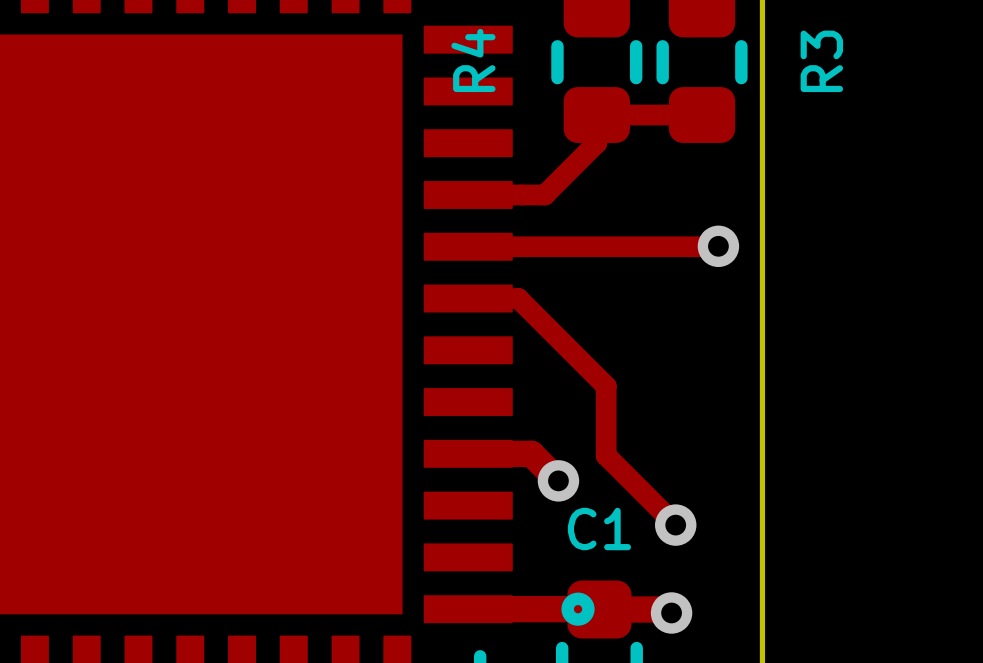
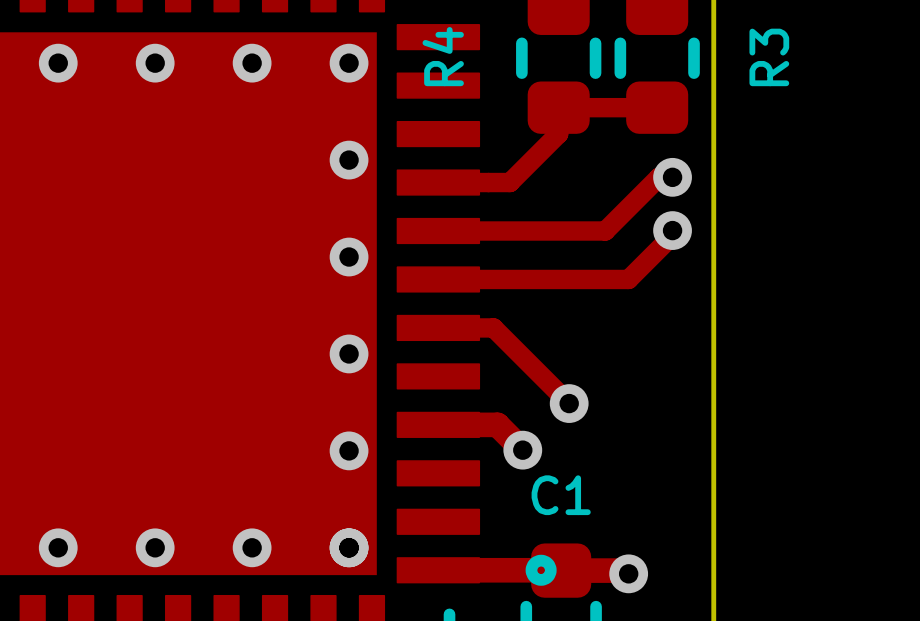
via: none -> (58, 63)
via: none -> (155, 63)
via: none -> (252, 63)
via: none -> (349, 63)
via: none -> (349, 160)
via: none -> (672, 177)
track: (646, 246) (717, 246) -> (605, 231) (658, 177) (672, 177)
via: none -> (349, 257)
track: (518, 298) (606, 386) (606, 455) (675, 525) -> (485, 279) (628, 279) (672, 235)
track: none -> (438, 327) (493, 327) (569, 403)
via: none -> (349, 353)
via: none -> (349, 450)
via position: (675, 525) -> (569, 403)
via: none -> (58, 547)
via: none -> (155, 547)
via: none -> (252, 547)
via: none -> (349, 547)

